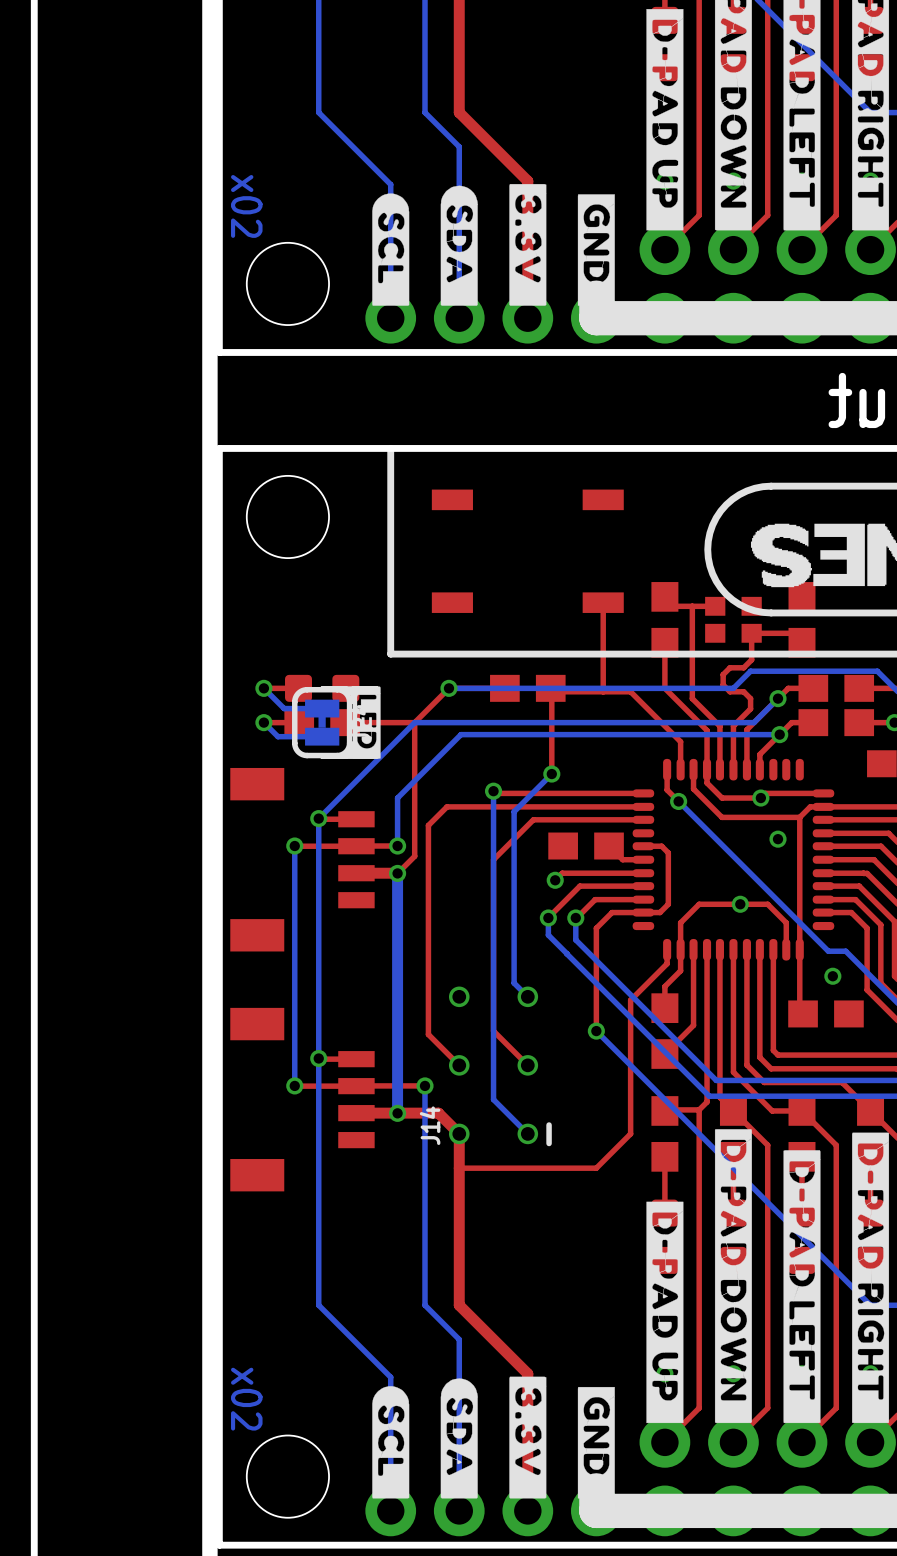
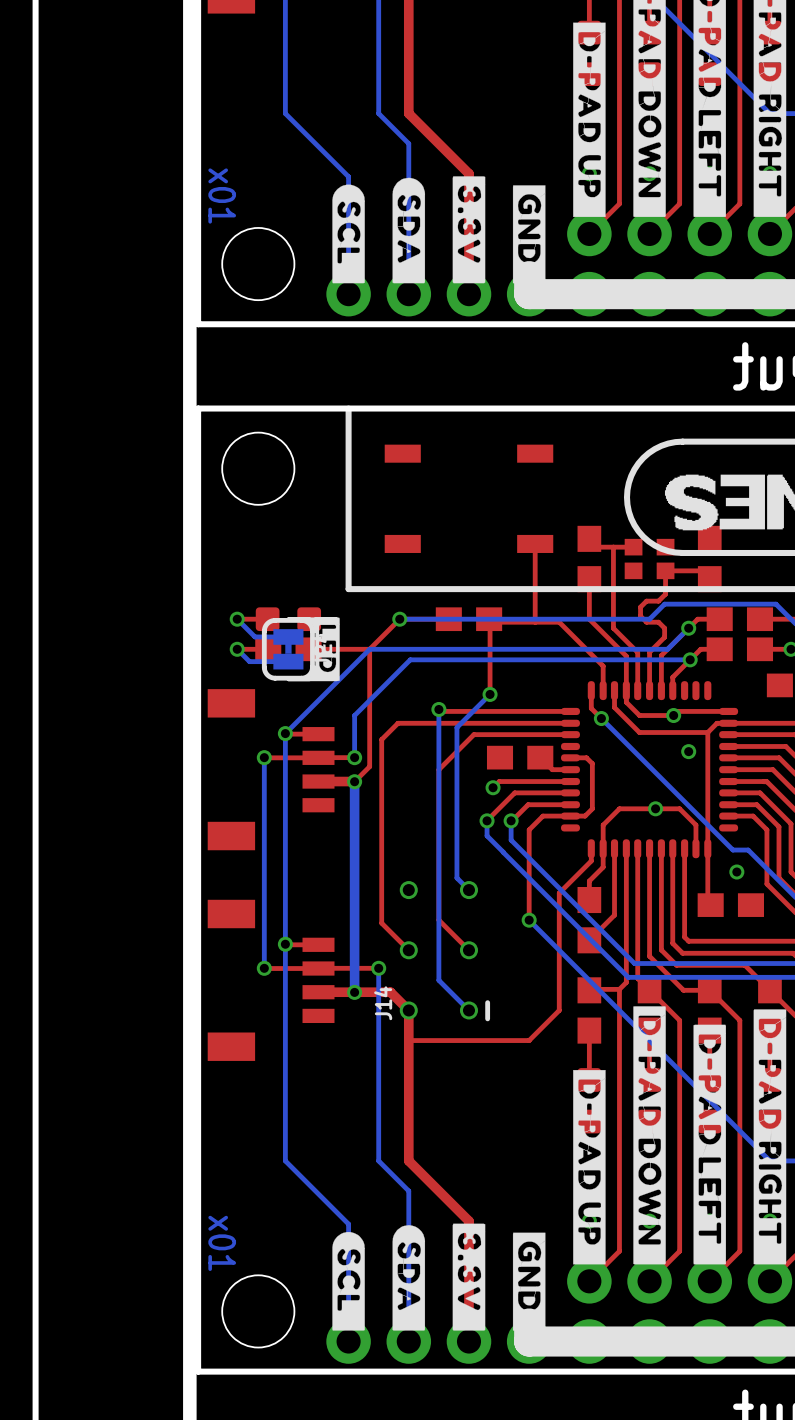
text: x02 (246, 206) -> x01 (222, 196)
text: x02 (246, 1399) -> x01 (222, 1243)

